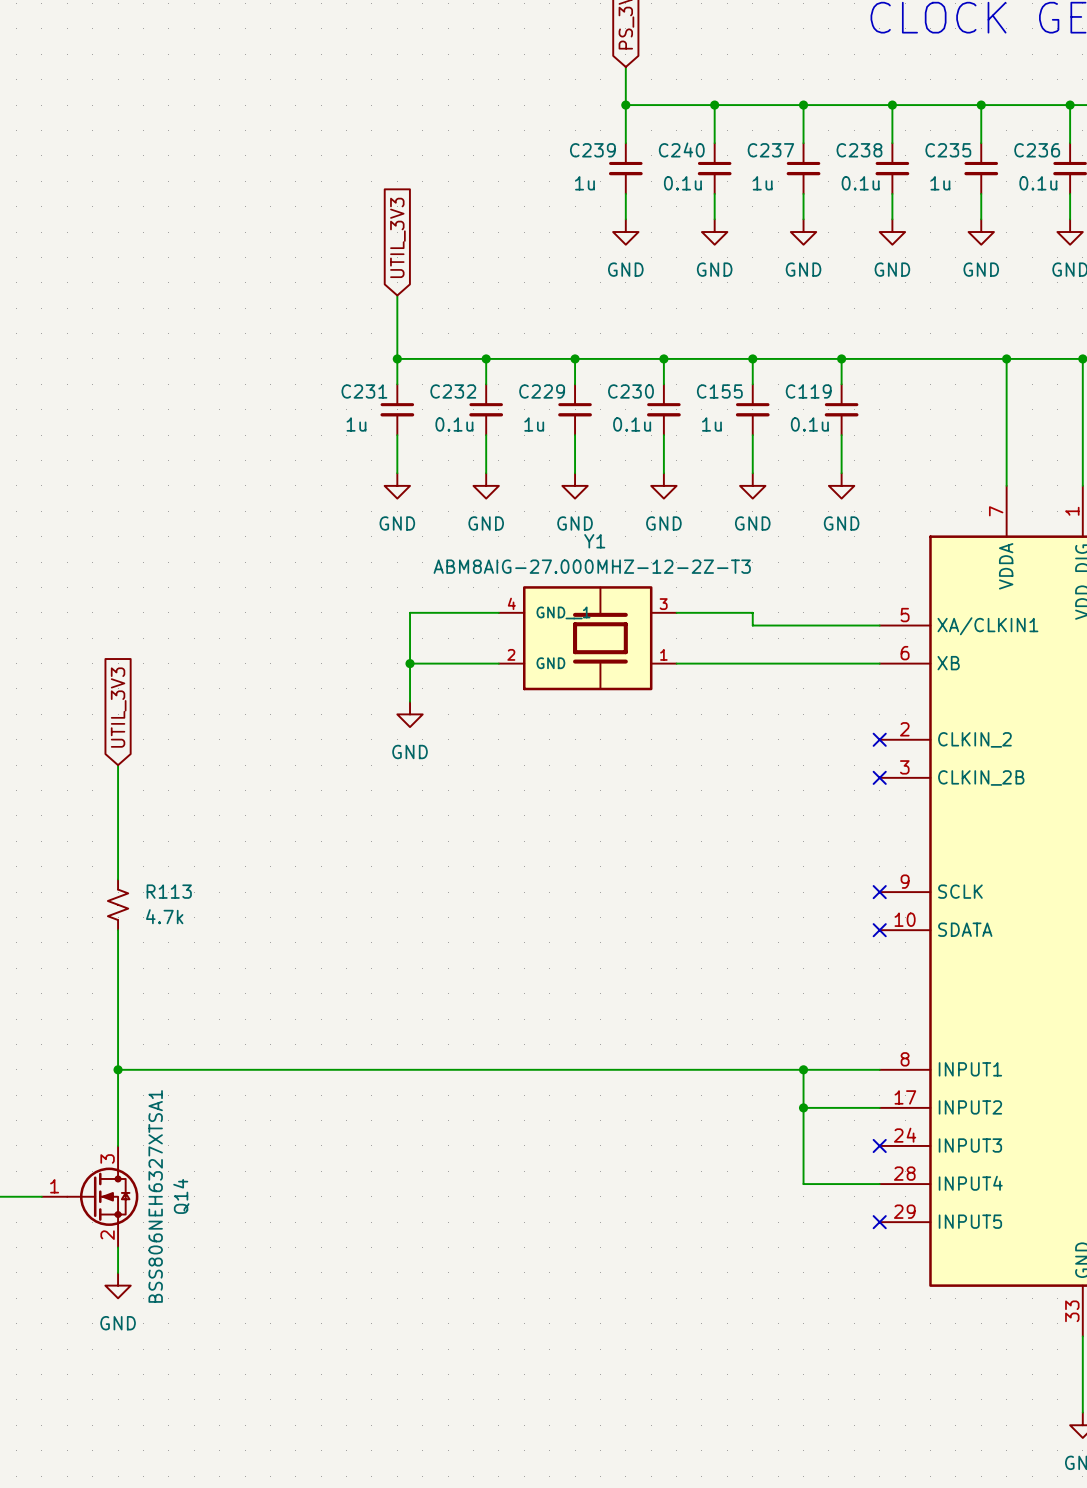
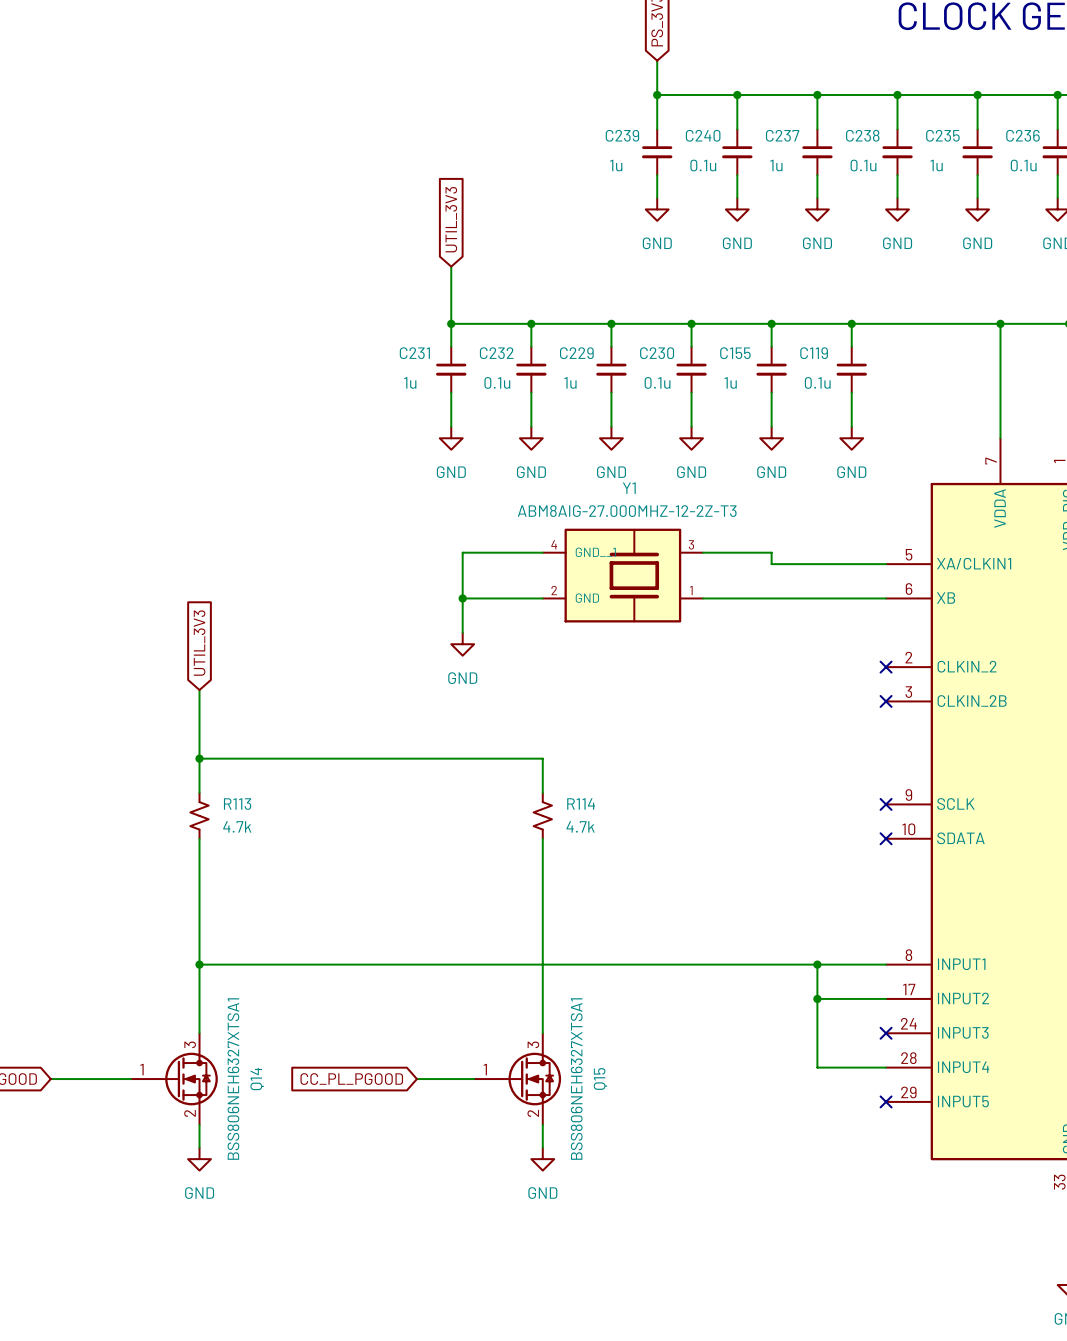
wire: none -> (199, 758) (542, 758) (542, 792)
junction: none -> (199, 758)
R114: none -> 4.7k (542, 815)
wire: none -> (542, 838) (542, 1033)
wire: none -> (416, 1079) (474, 1079)
Q15: none -> BSS806NEH6327XTSA1 (517, 1079)
global label: none -> CC_PL_PGOOD (351, 1079)
wire: none -> (542, 1124) (542, 1147)
power symbol: none -> GND (542, 1159)

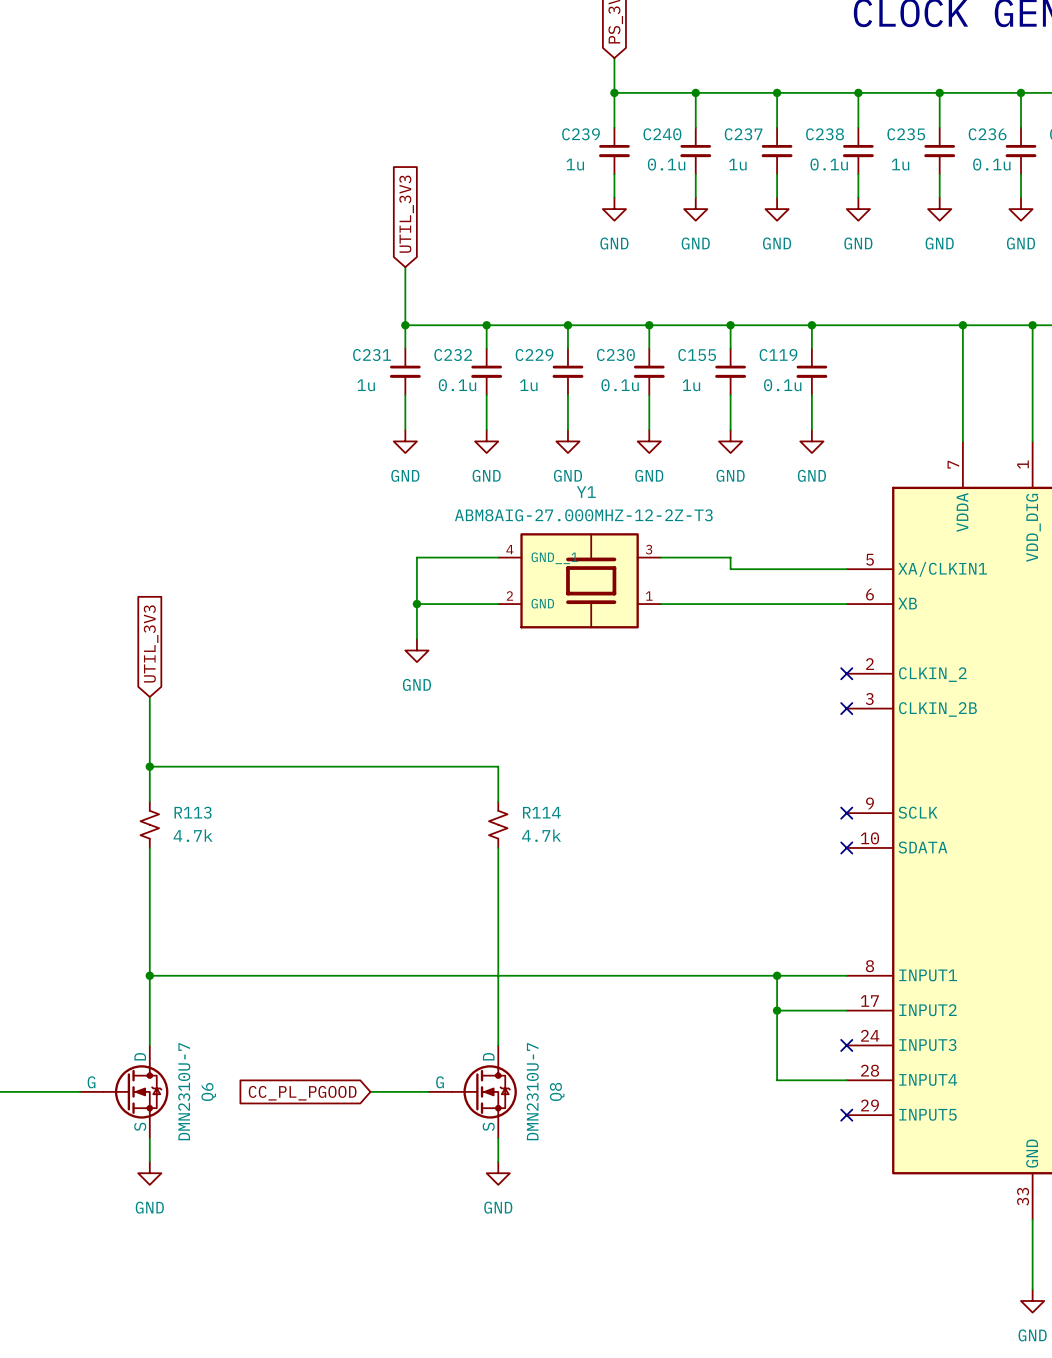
Q14: BSS806NEH6327XTSA1 (174, 1079) -> none
Q6: none -> DMN2310U-7 (124, 1091)
Q15: BSS806NEH6327XTSA1 (517, 1079) -> none
Q8: none -> DMN2310U-7 (472, 1091)

